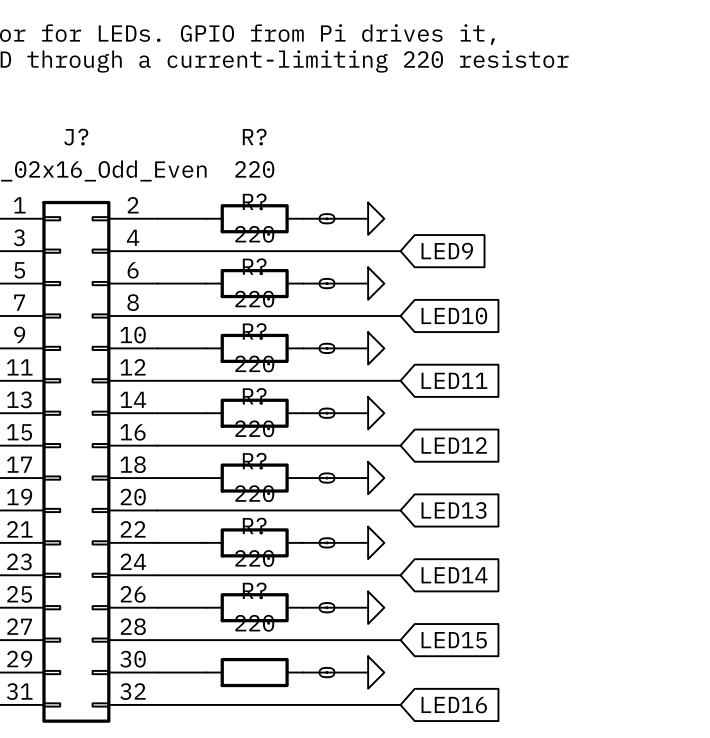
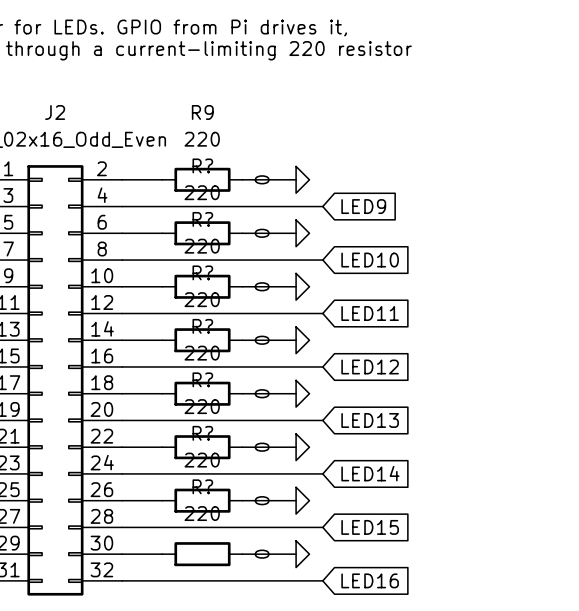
J? name: J? (76, 137) -> J2 (55, 112)
R? name: R? (254, 137) -> R9 (202, 112)

